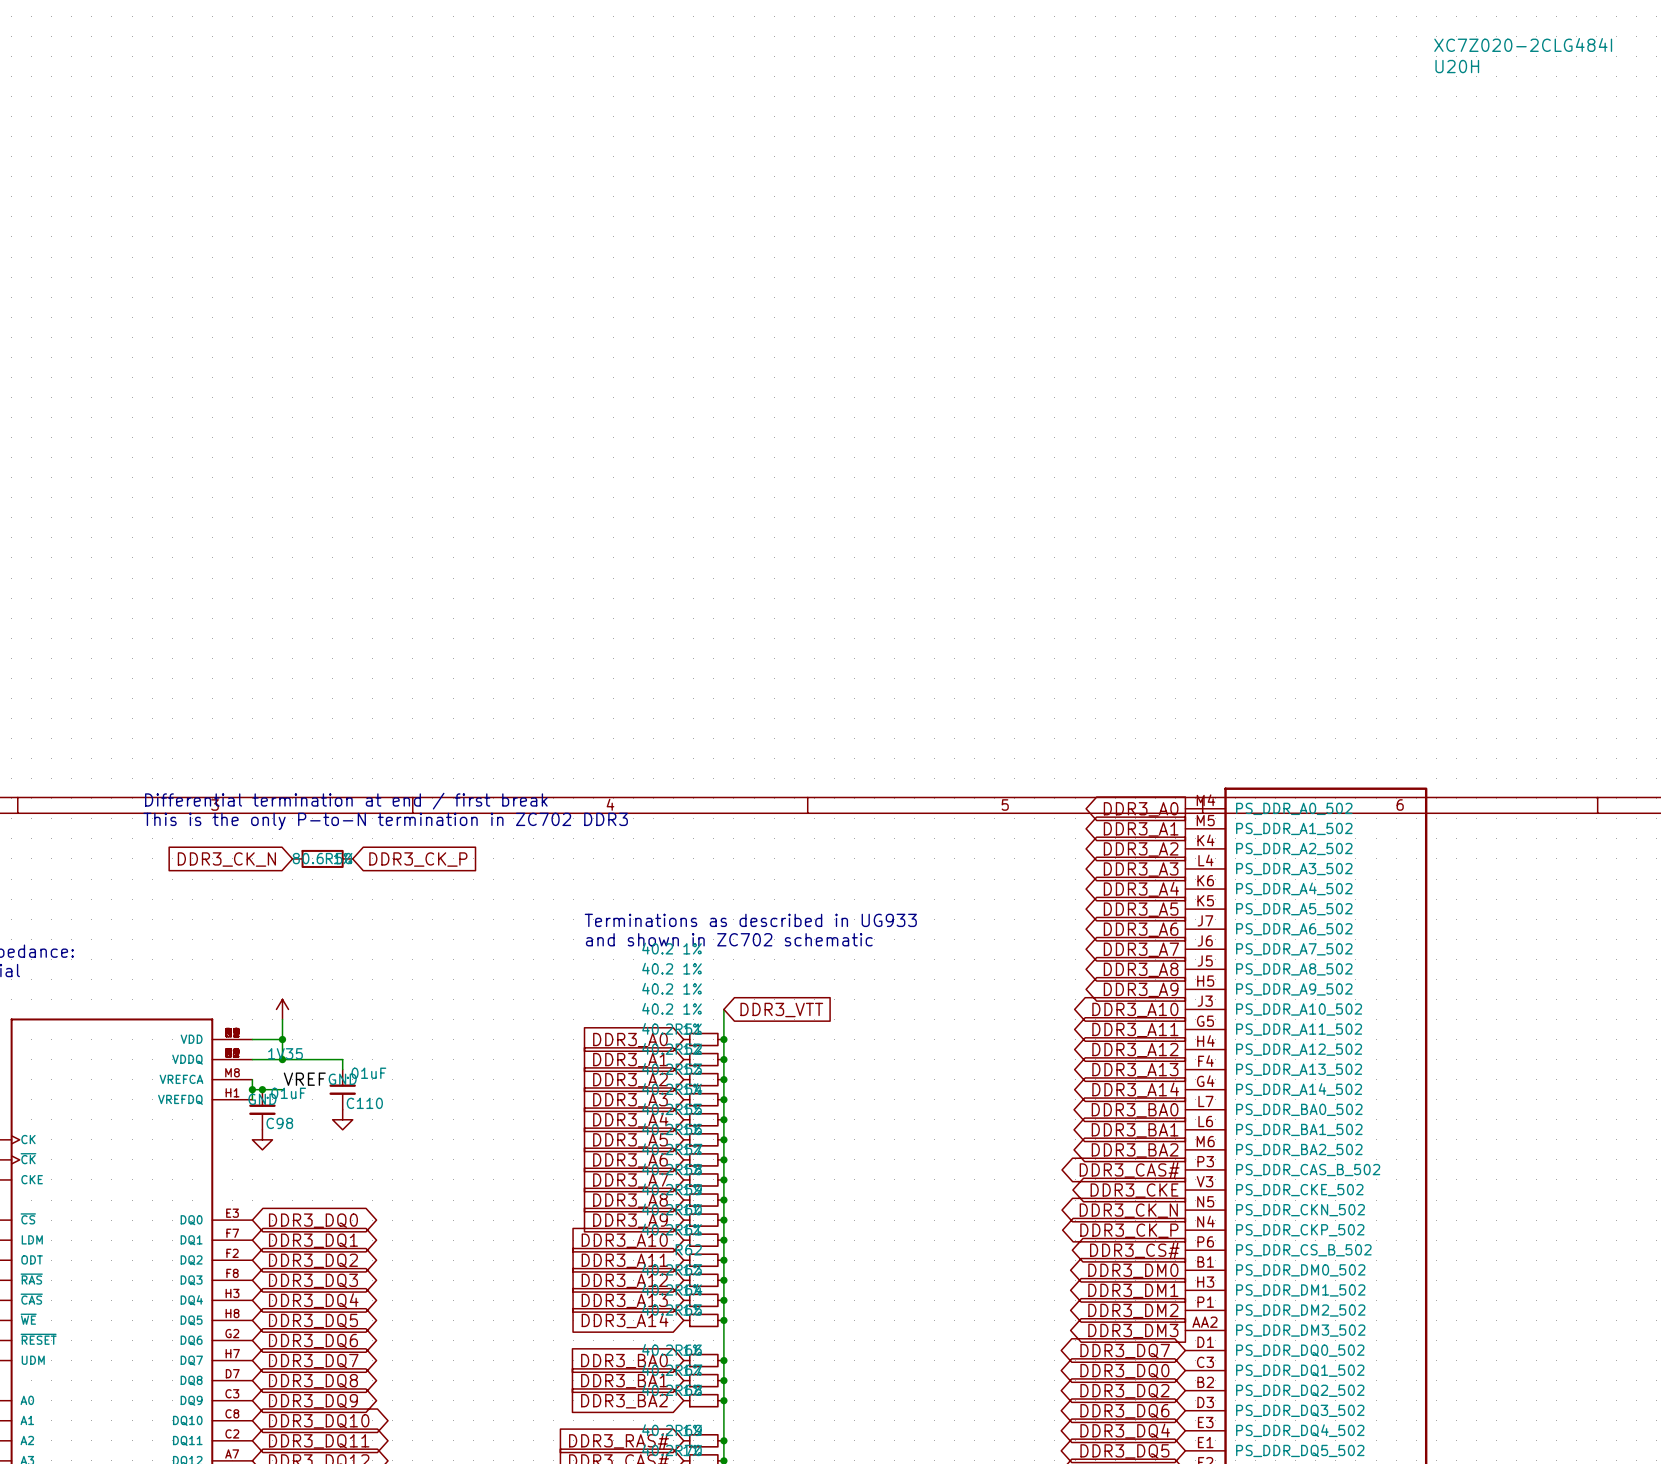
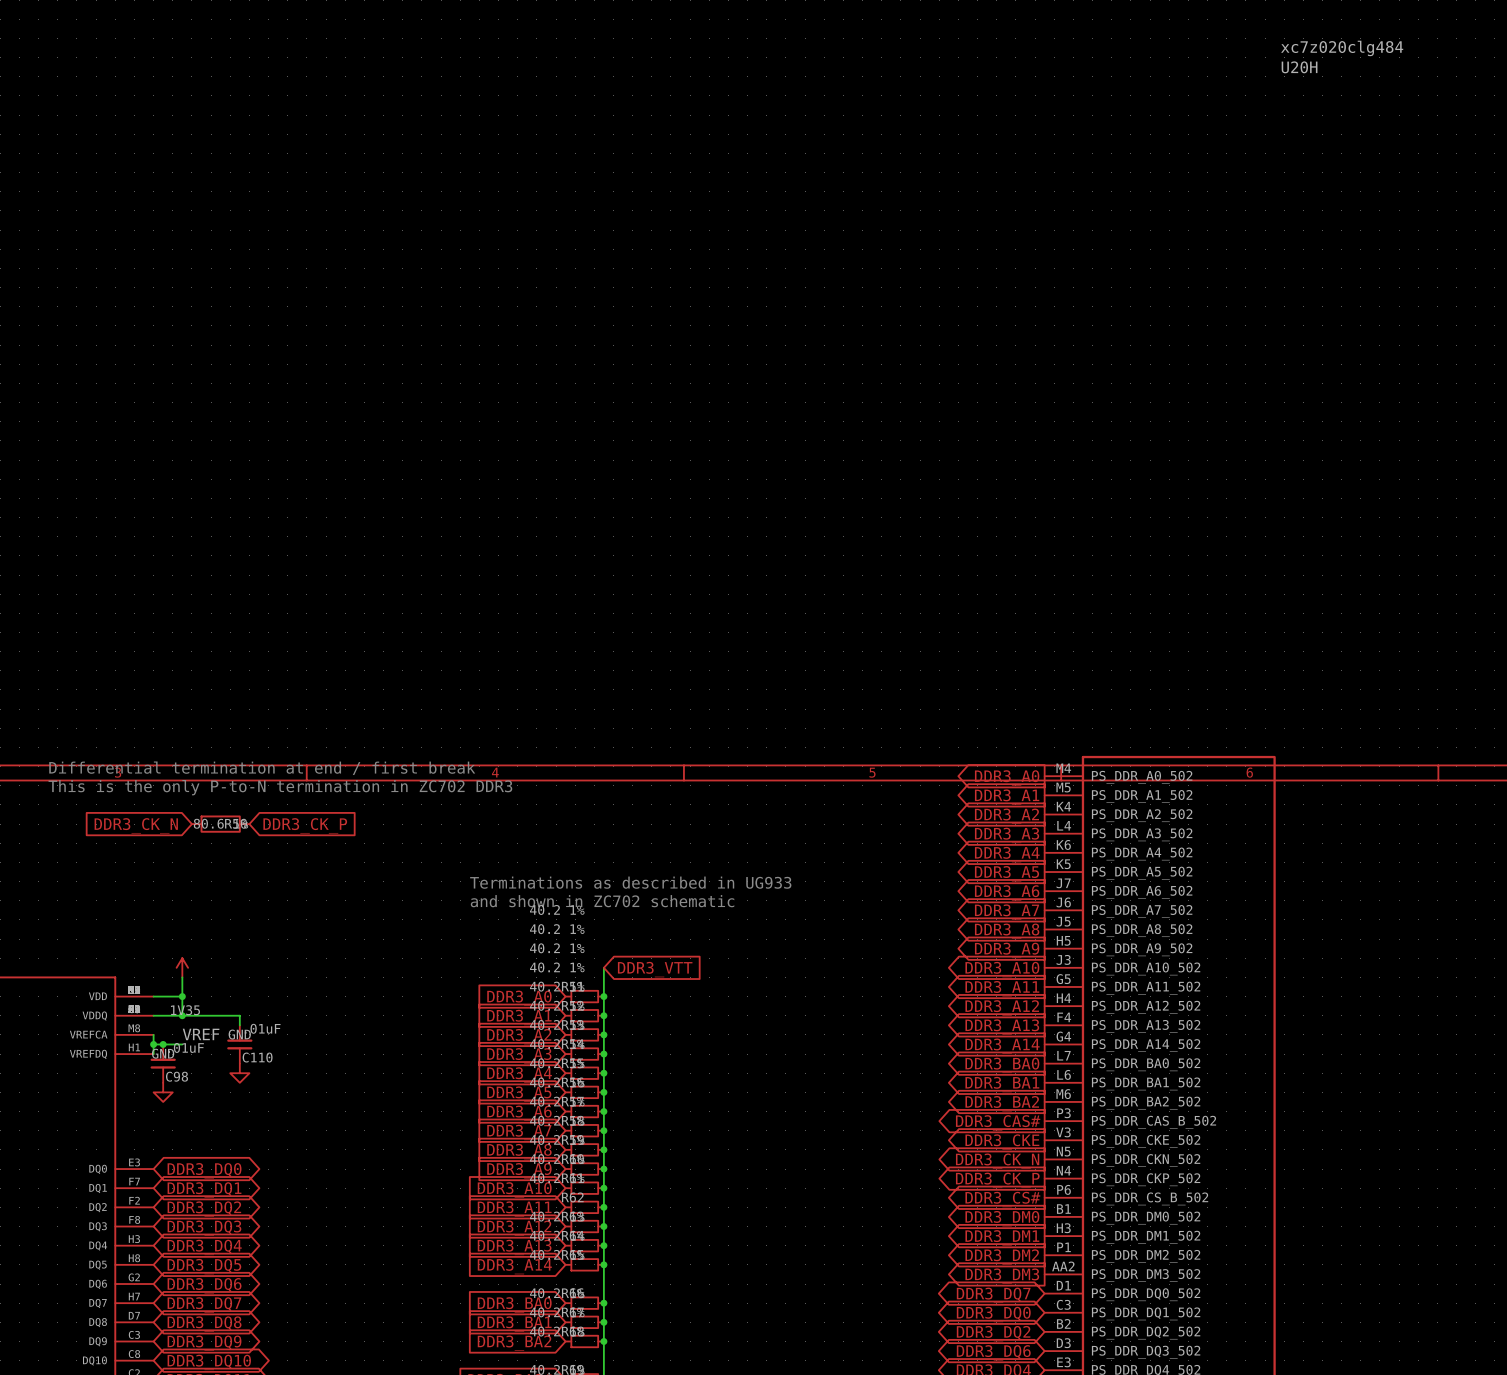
U20H value: XC7Z020-2CLG484I (1523, 44) -> xc7z020clg484 (1342, 48)

